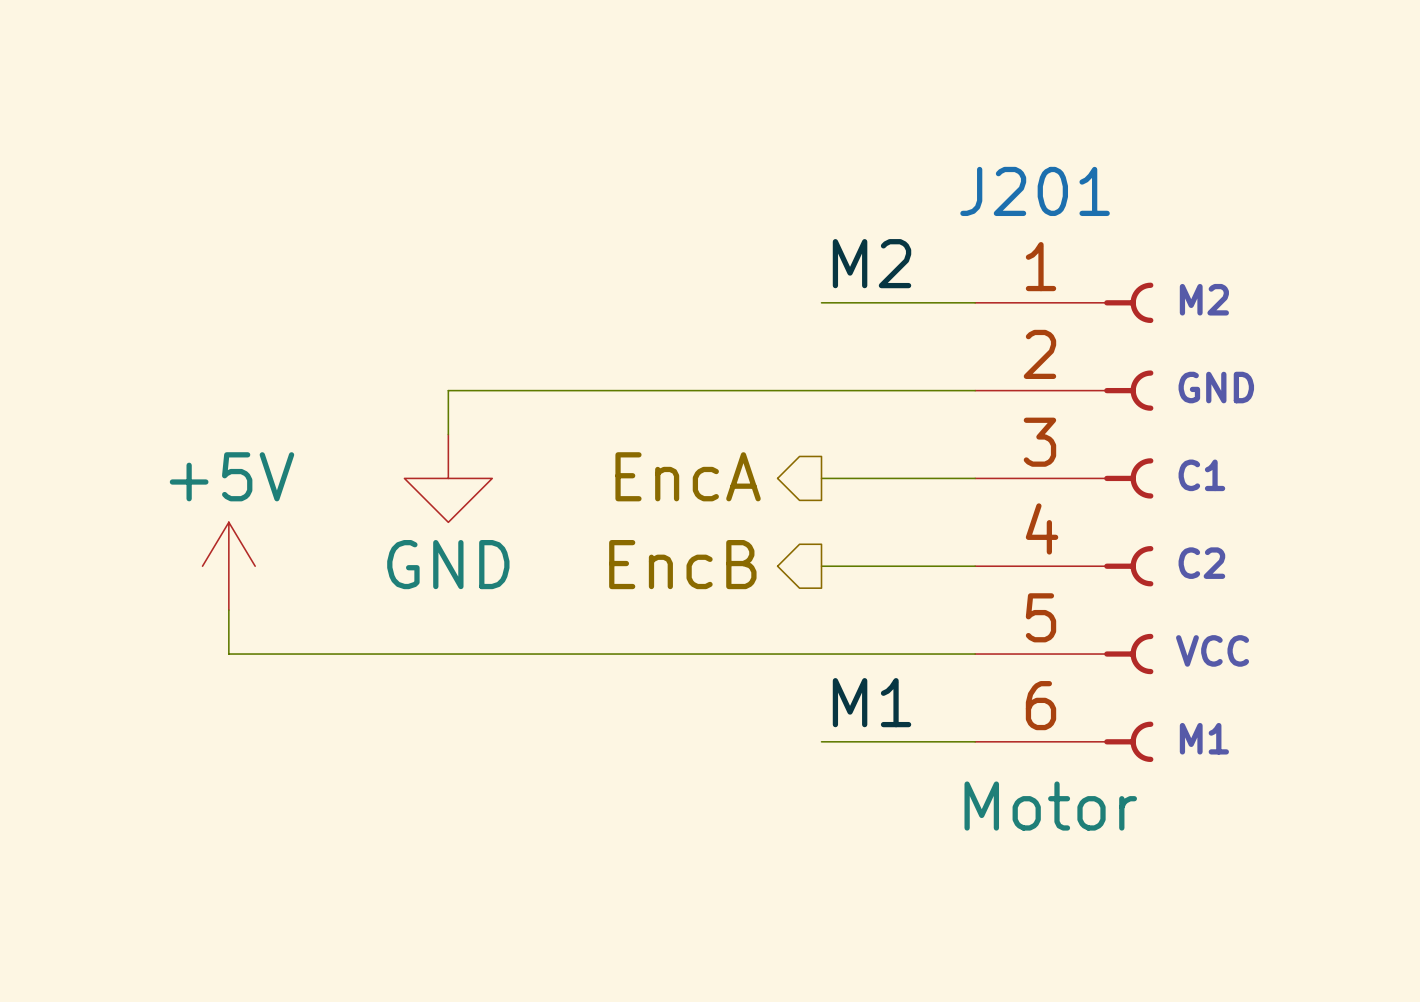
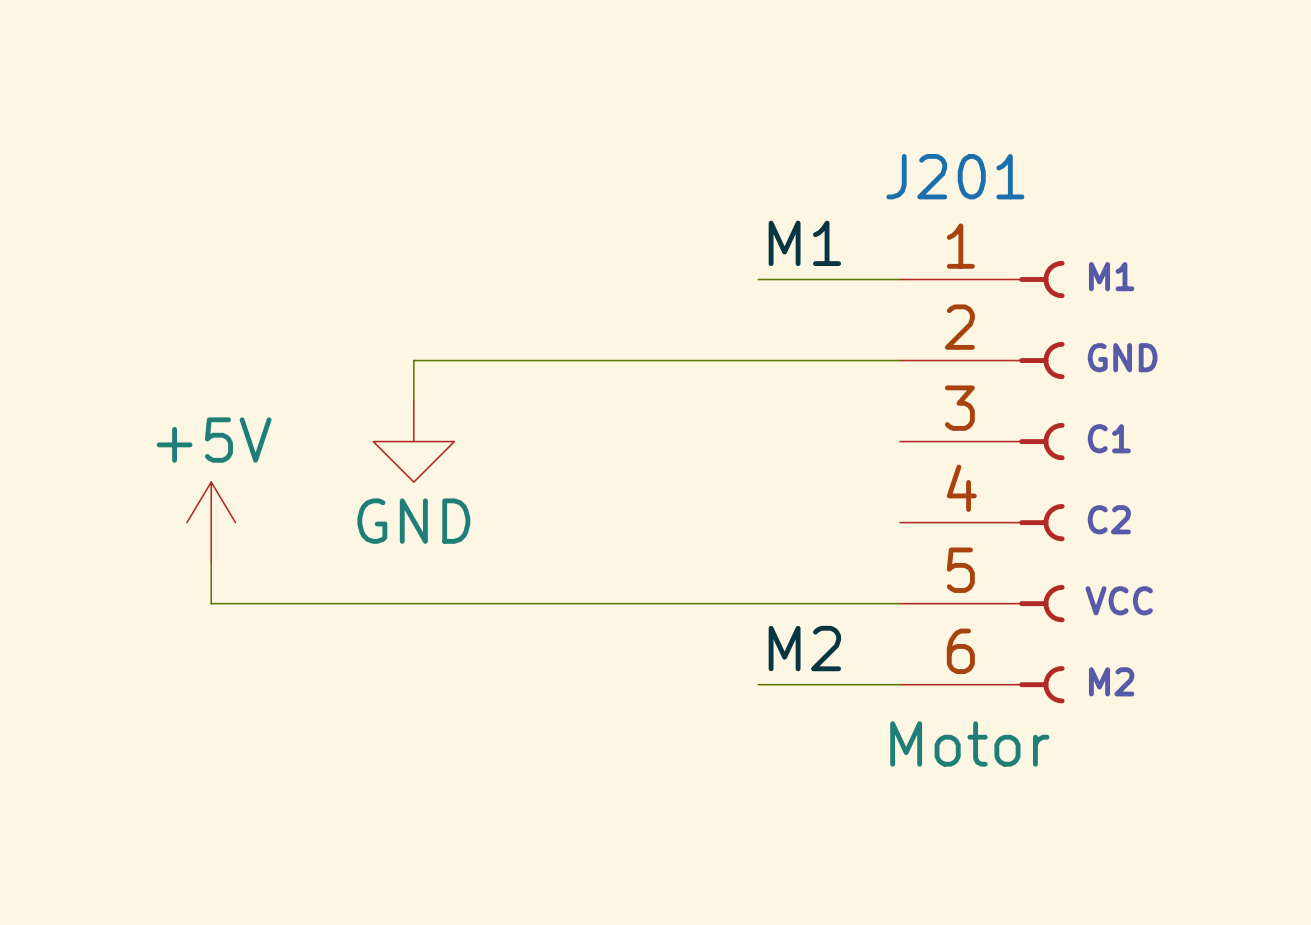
label: M2 (872, 263) -> M1 (804, 243)
text: M2 (1204, 299) -> M1 (1111, 276)
hierarchical label: EncA (688, 476) -> none
wire: (821, 478) (975, 478) -> none
hierarchical label: EncB (682, 564) -> none
wire: (821, 566) (975, 566) -> none
label: M1 (872, 702) -> M2 (804, 648)
text: M1 (1204, 738) -> M2 (1111, 681)

